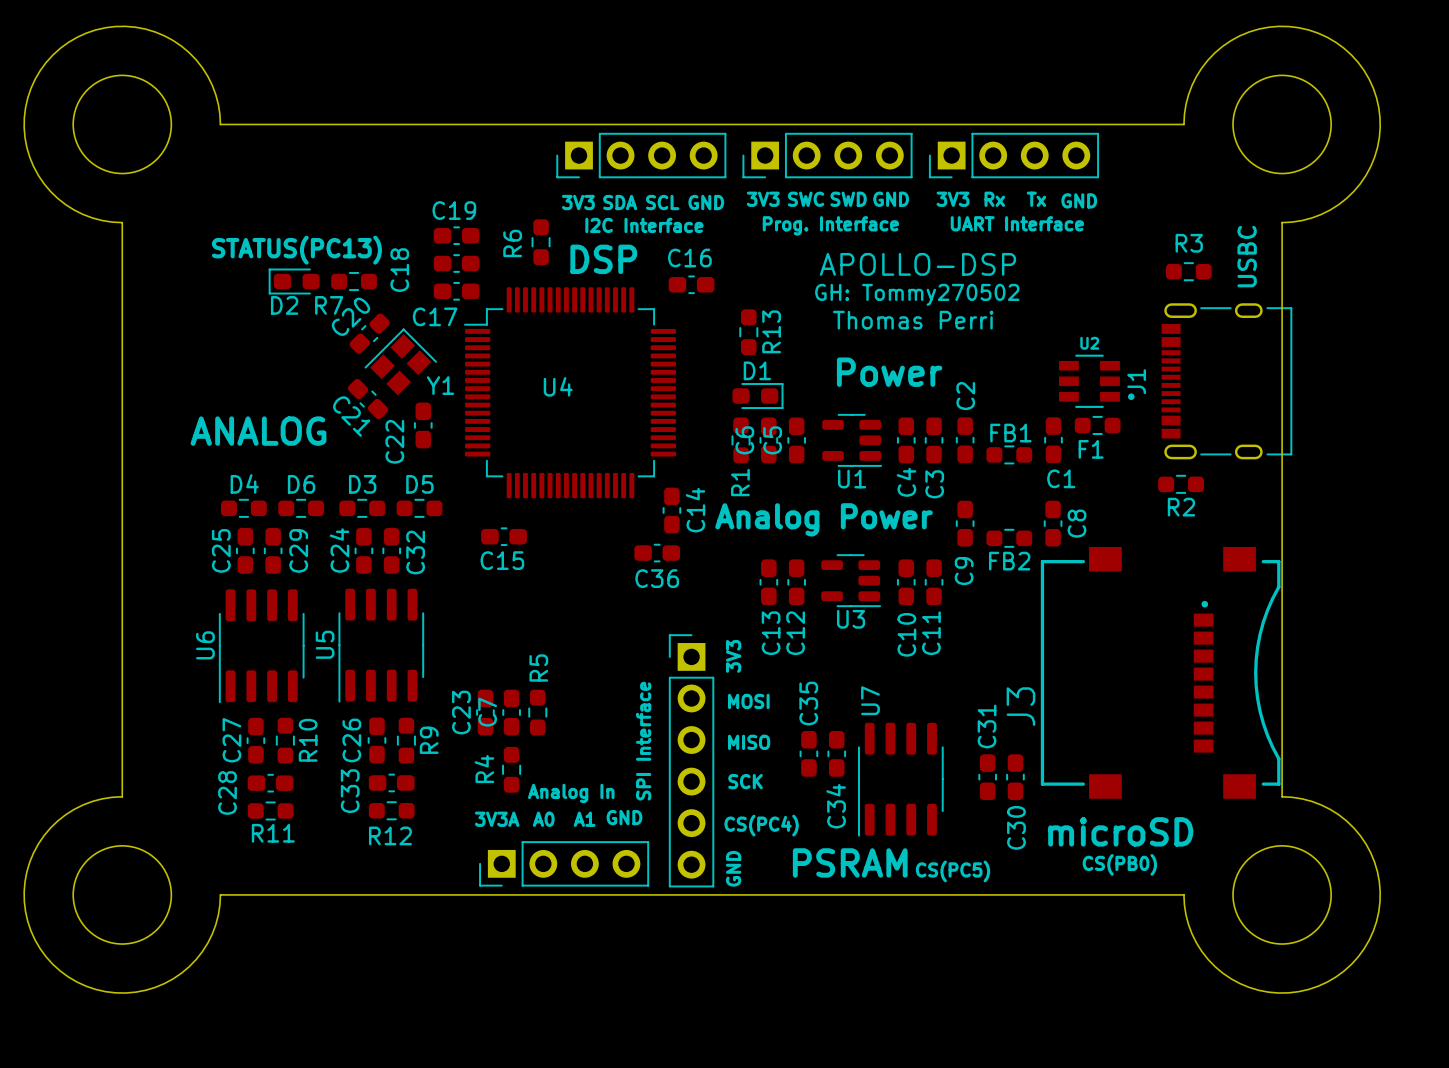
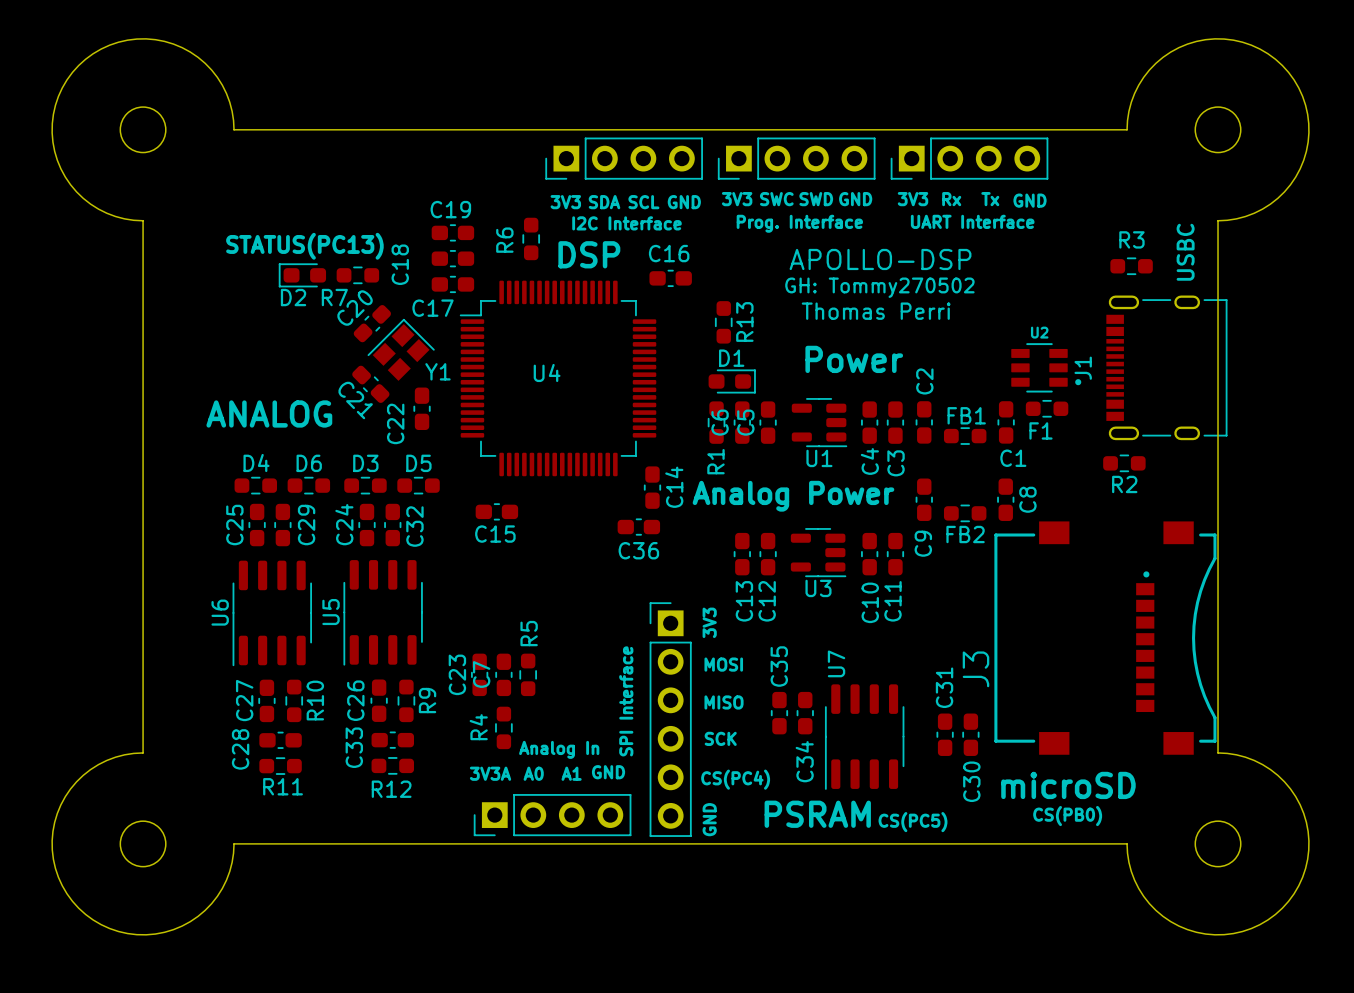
round board edge size: [72, 74, 173, 175] -> [119, 106, 167, 154]
round board edge size: [1232, 74, 1332, 175] -> [1194, 106, 1242, 154]
round board edge size: [72, 845, 173, 945] -> [119, 820, 167, 868]
round board edge size: [1232, 845, 1332, 945] -> [1194, 820, 1242, 868]

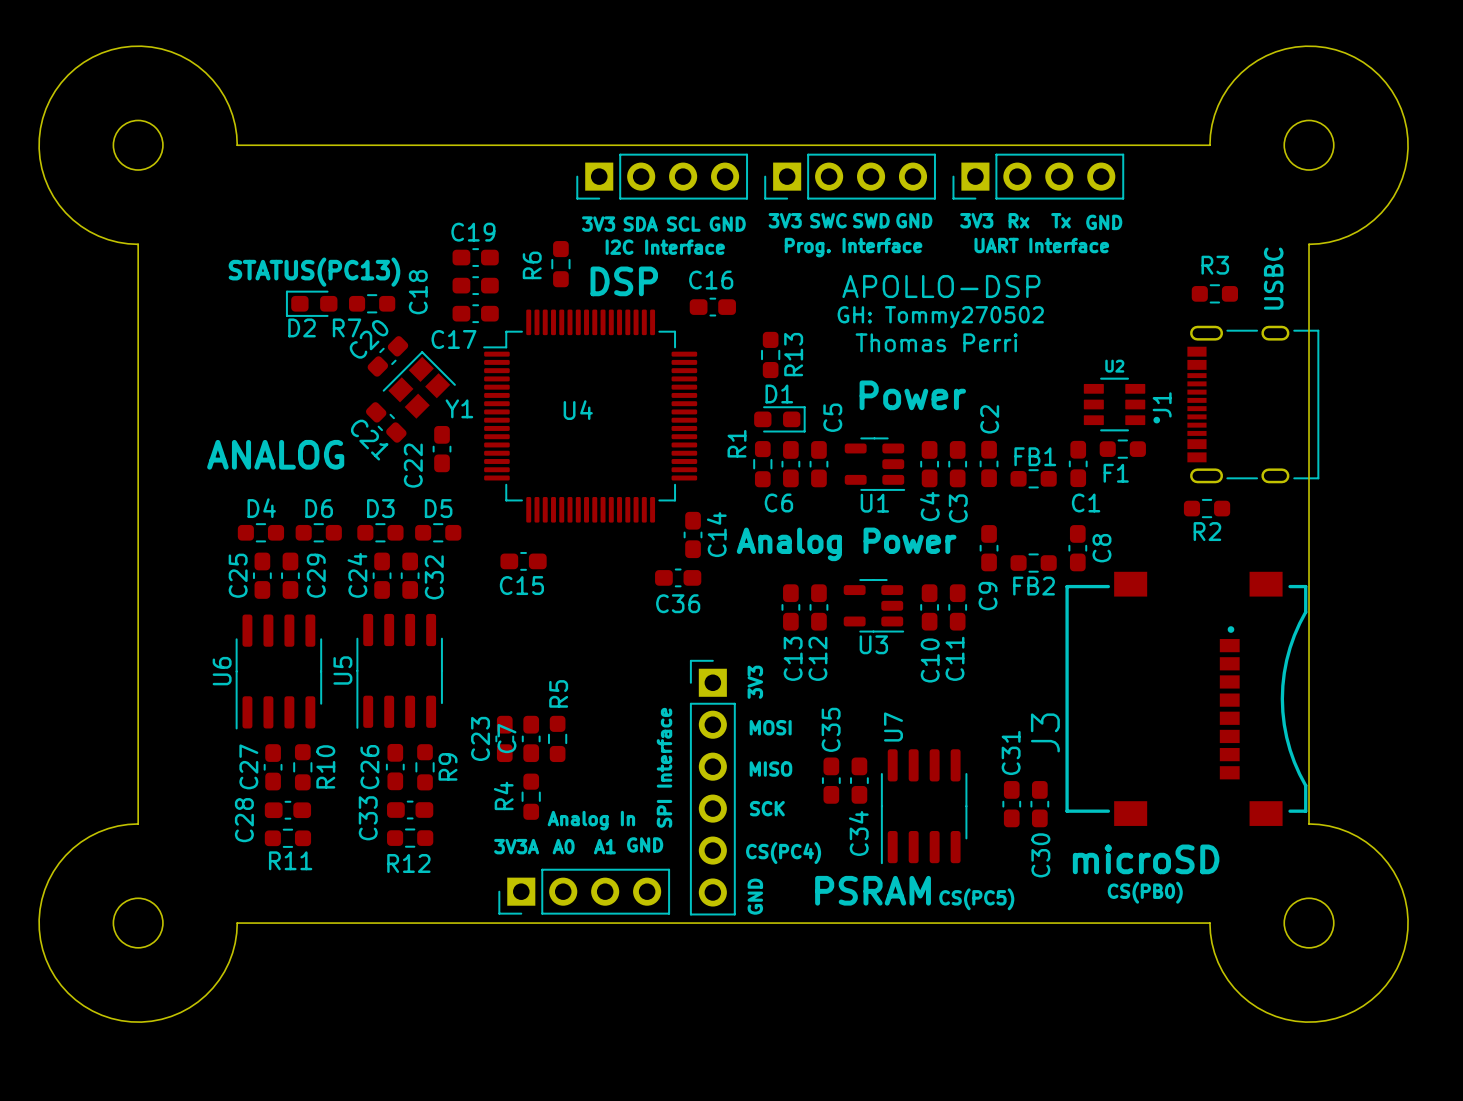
C6 name rotation: 0° (720, 422) -> 90° clockwise (778, 502)
C5 name position: C5 (745, 422) -> C5 (832, 417)
R1 name position: R1 (715, 461) -> R1 (737, 443)

